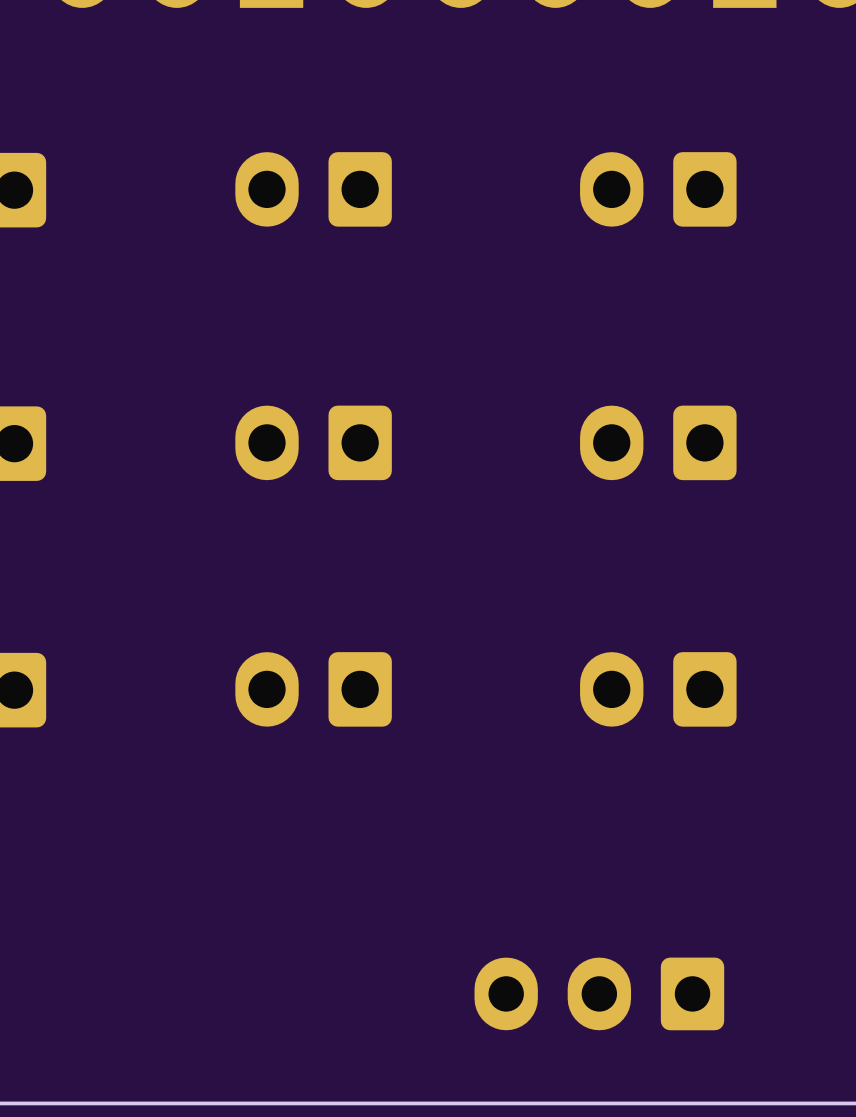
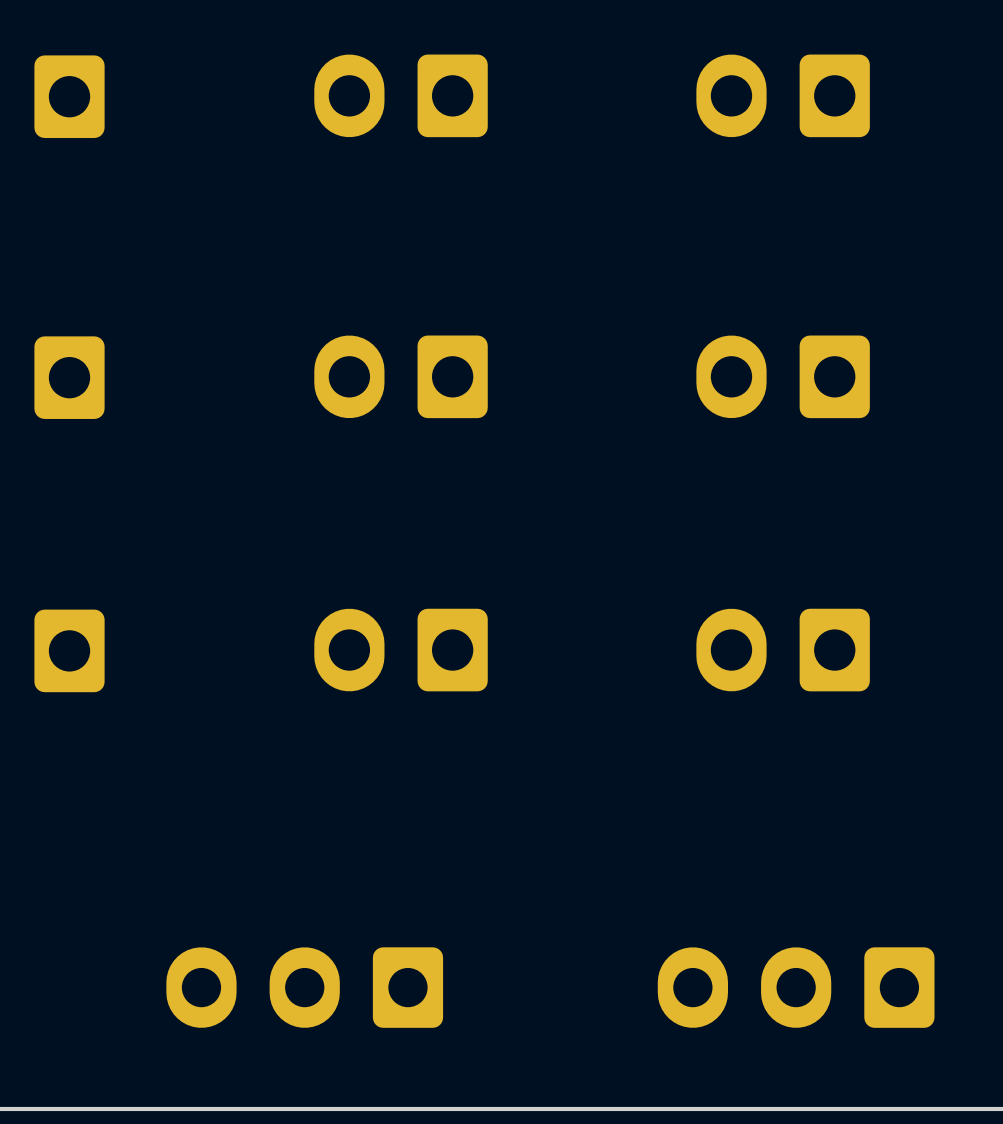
part: none -> (304, 987)
part position: (599, 993) -> (796, 987)

